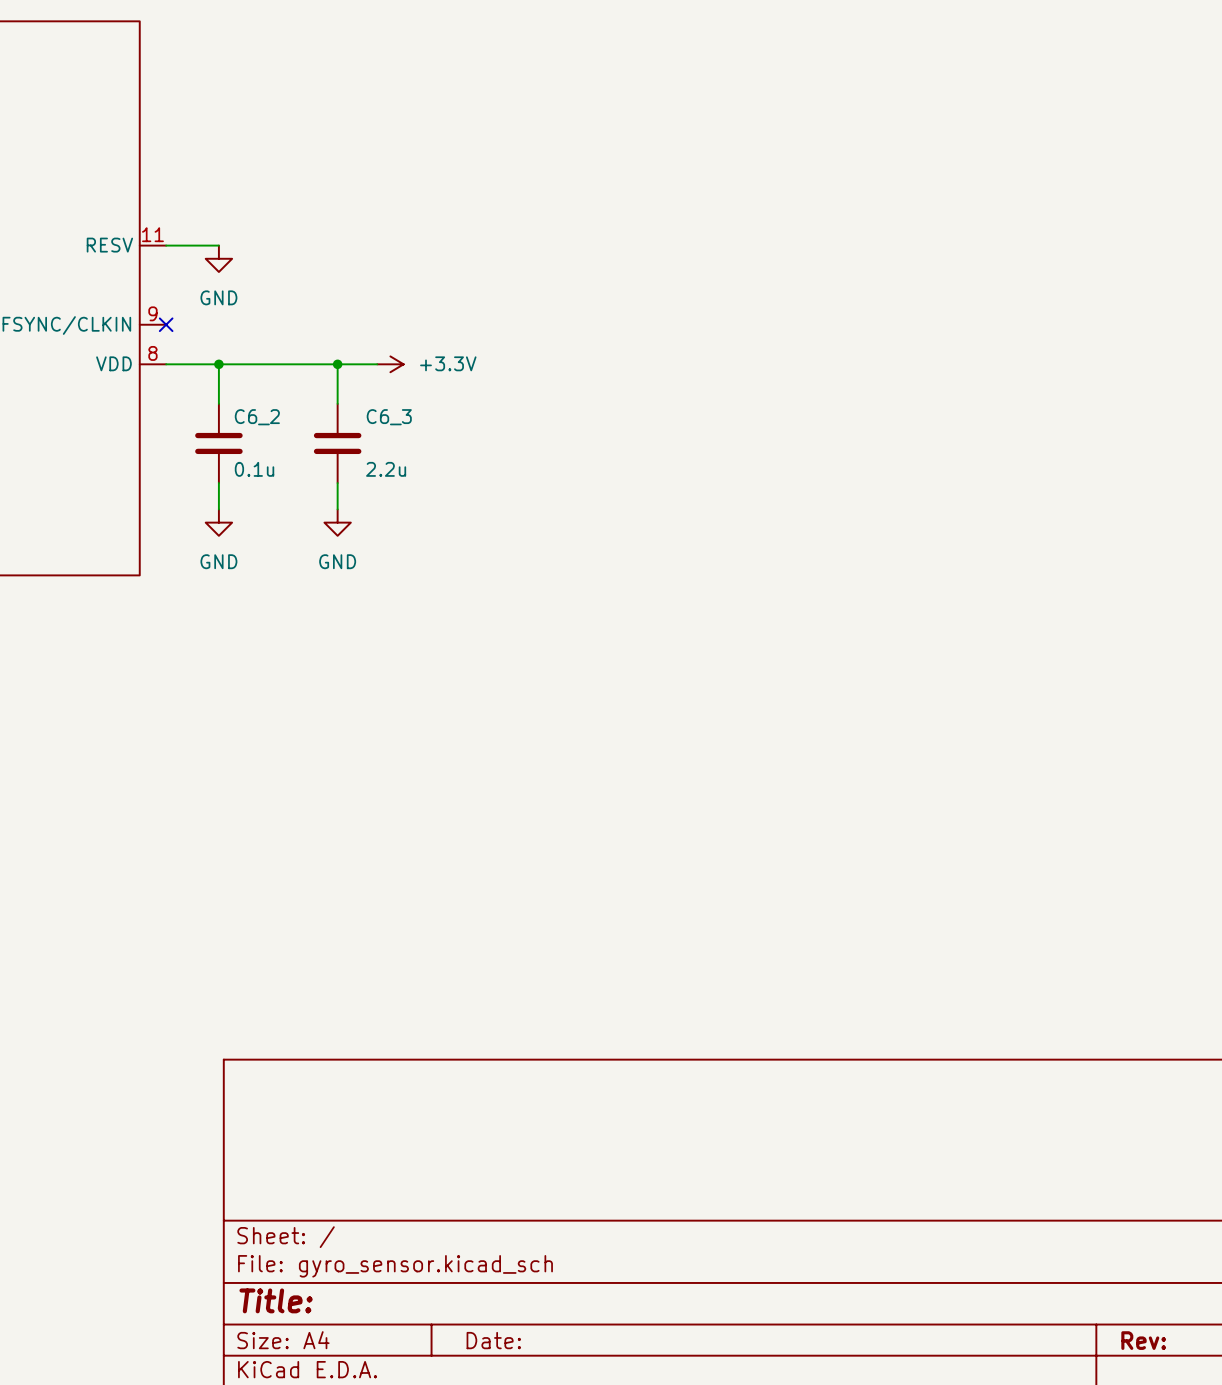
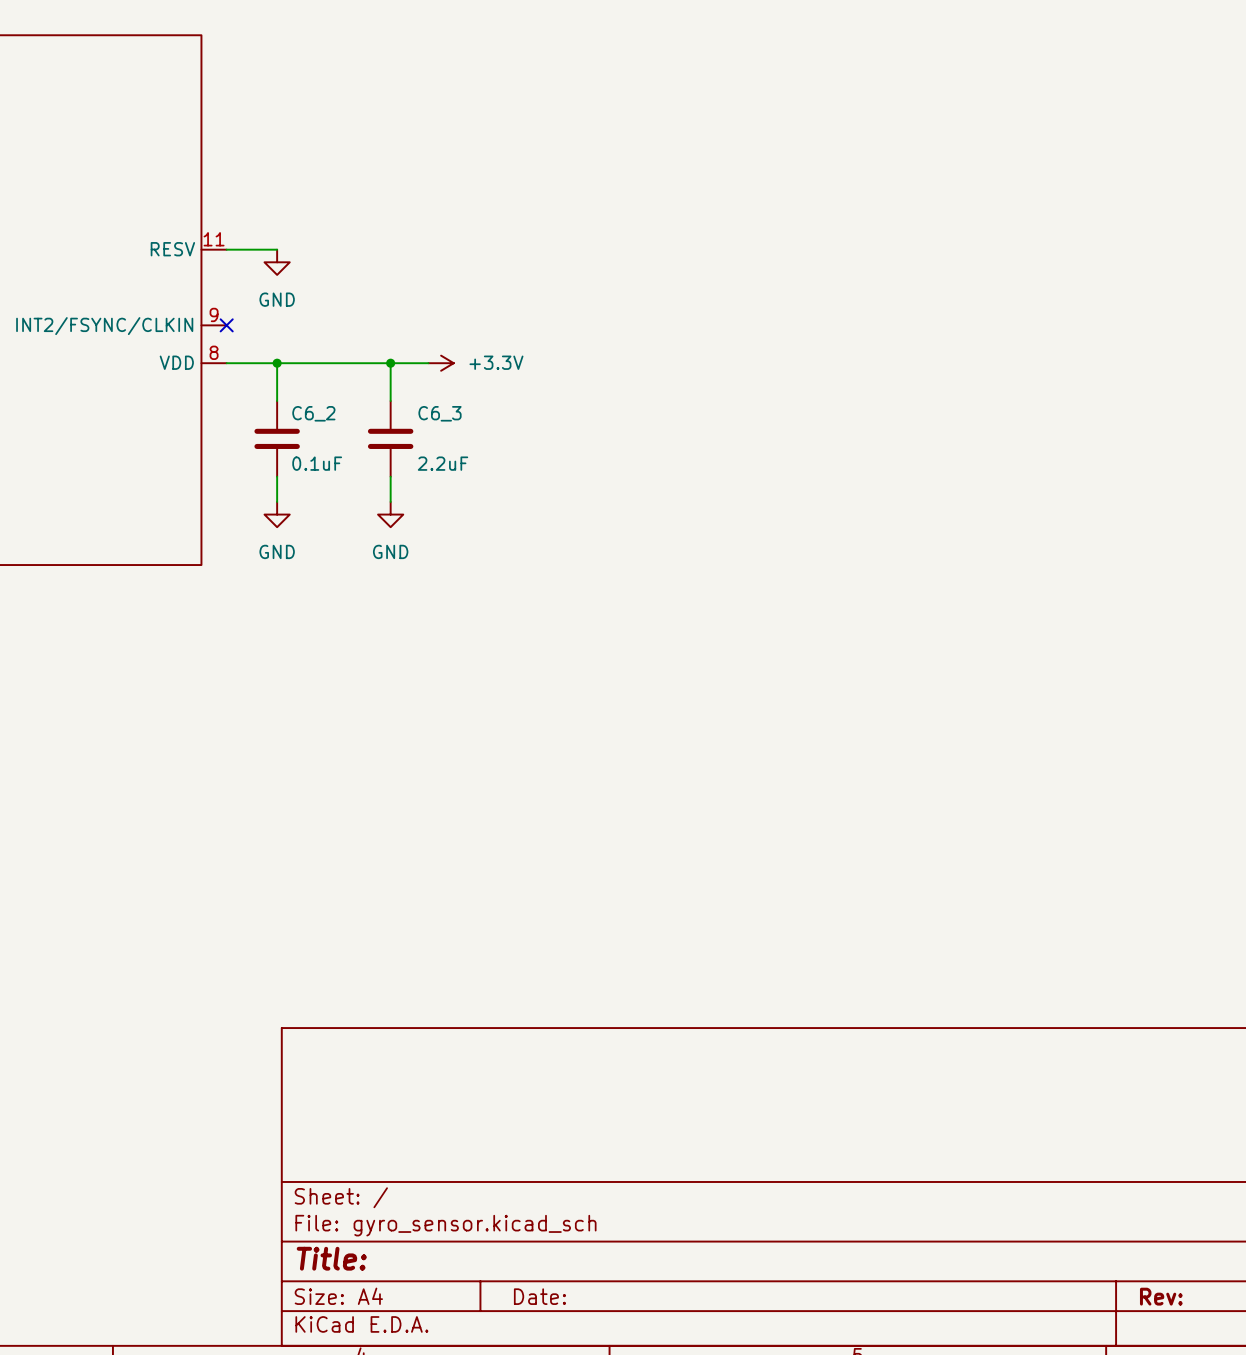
C6_2 value: 0.1u (254, 469) -> 0.1uF (317, 463)
C6_3 value: 2.2u (386, 469) -> 2.2uF (443, 463)

